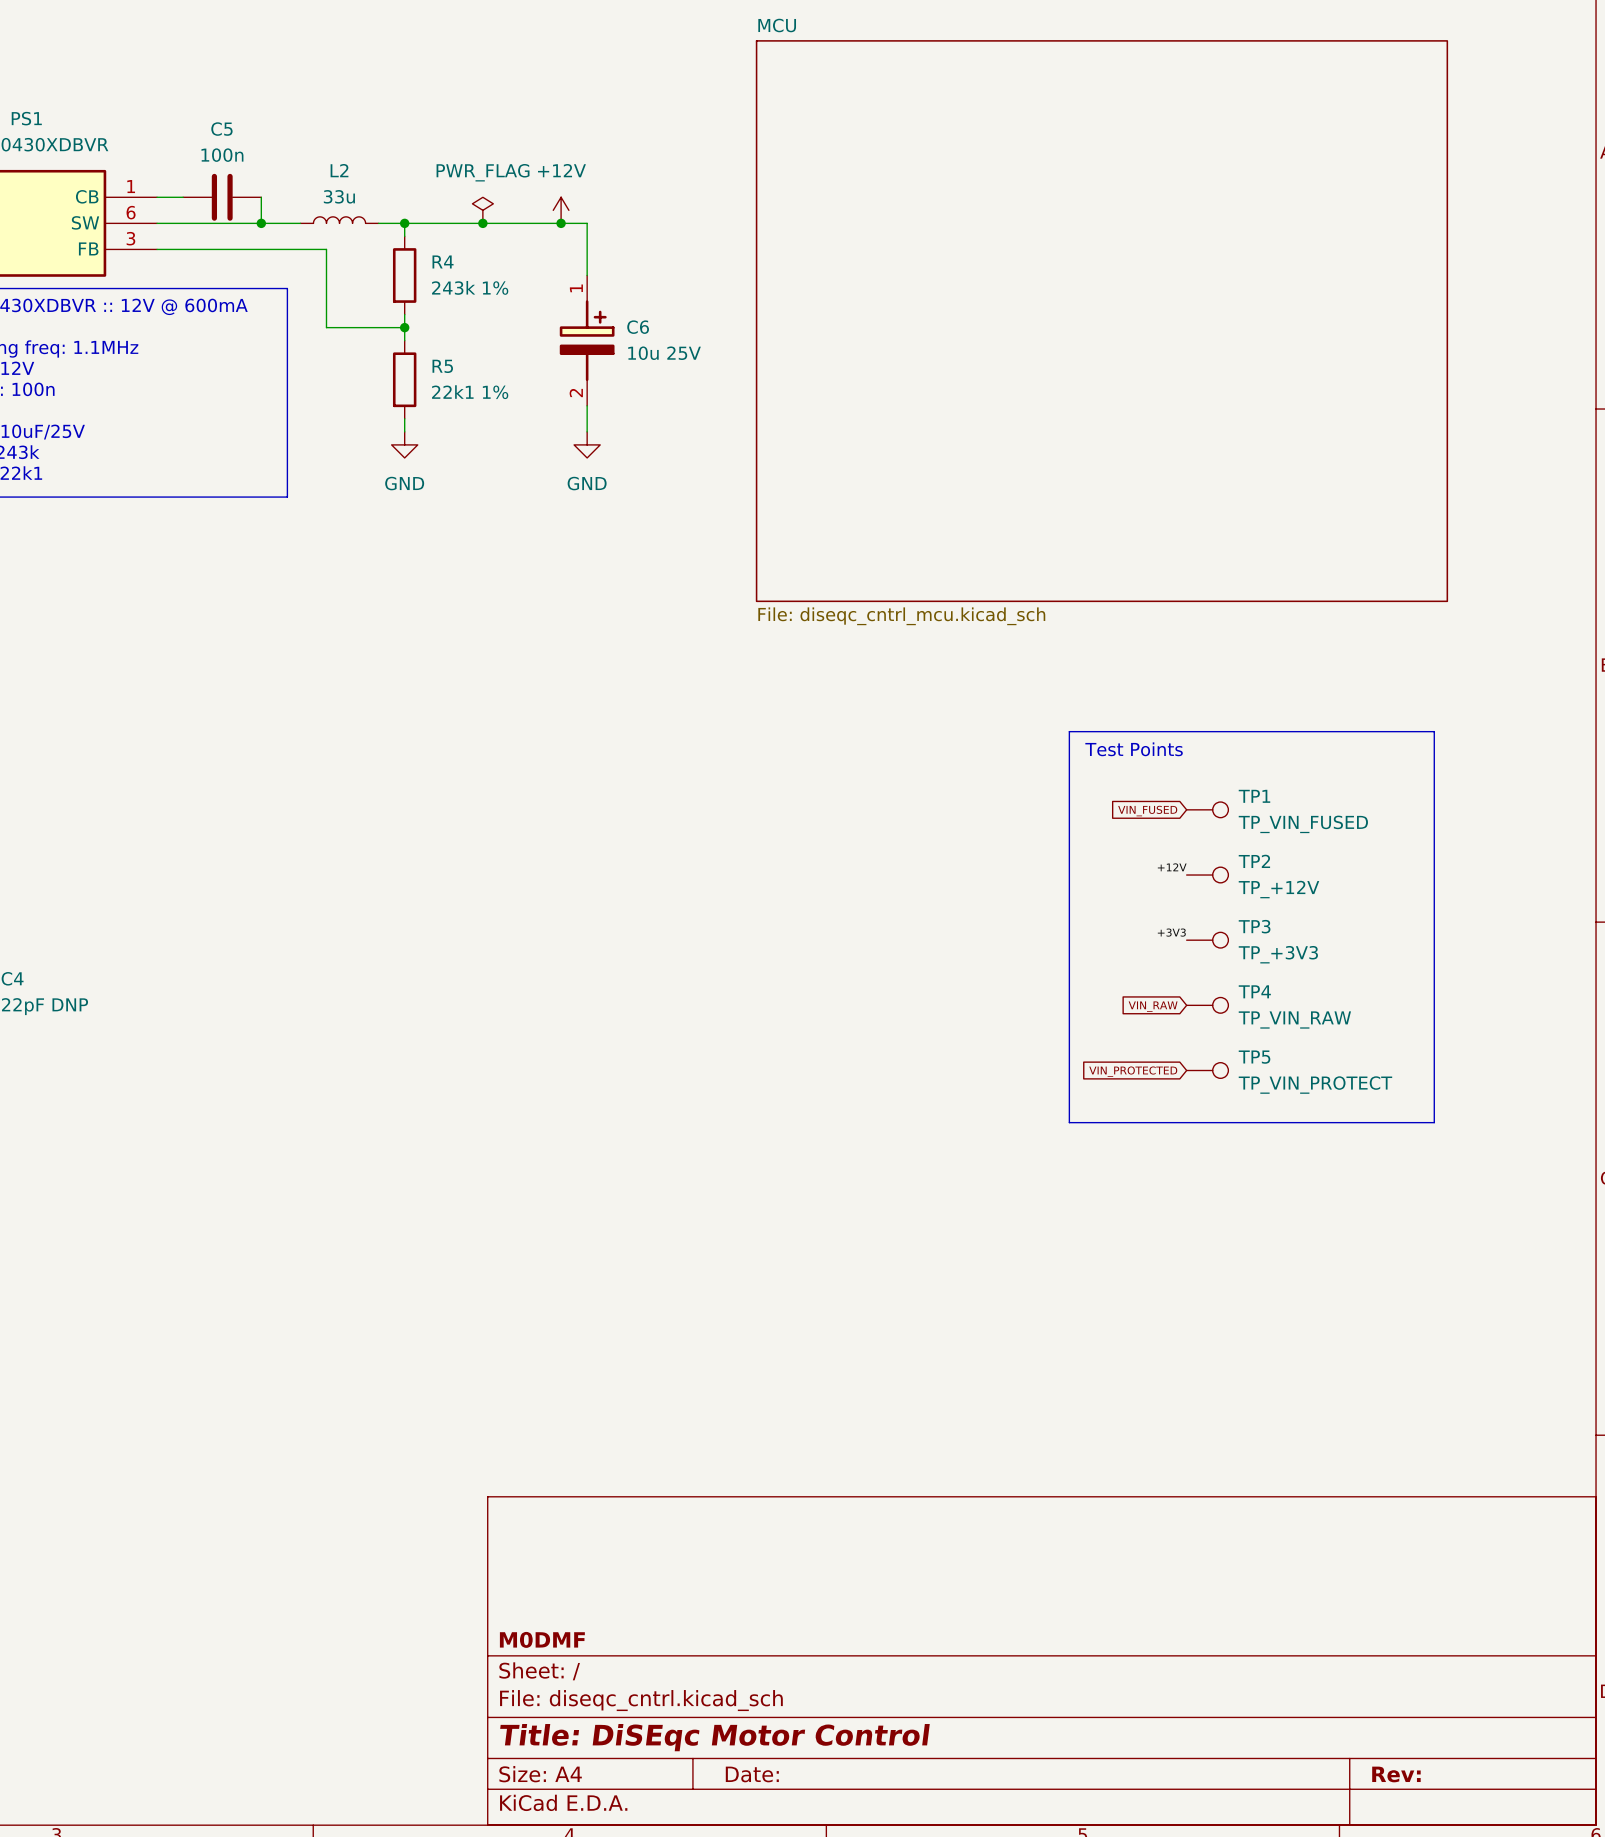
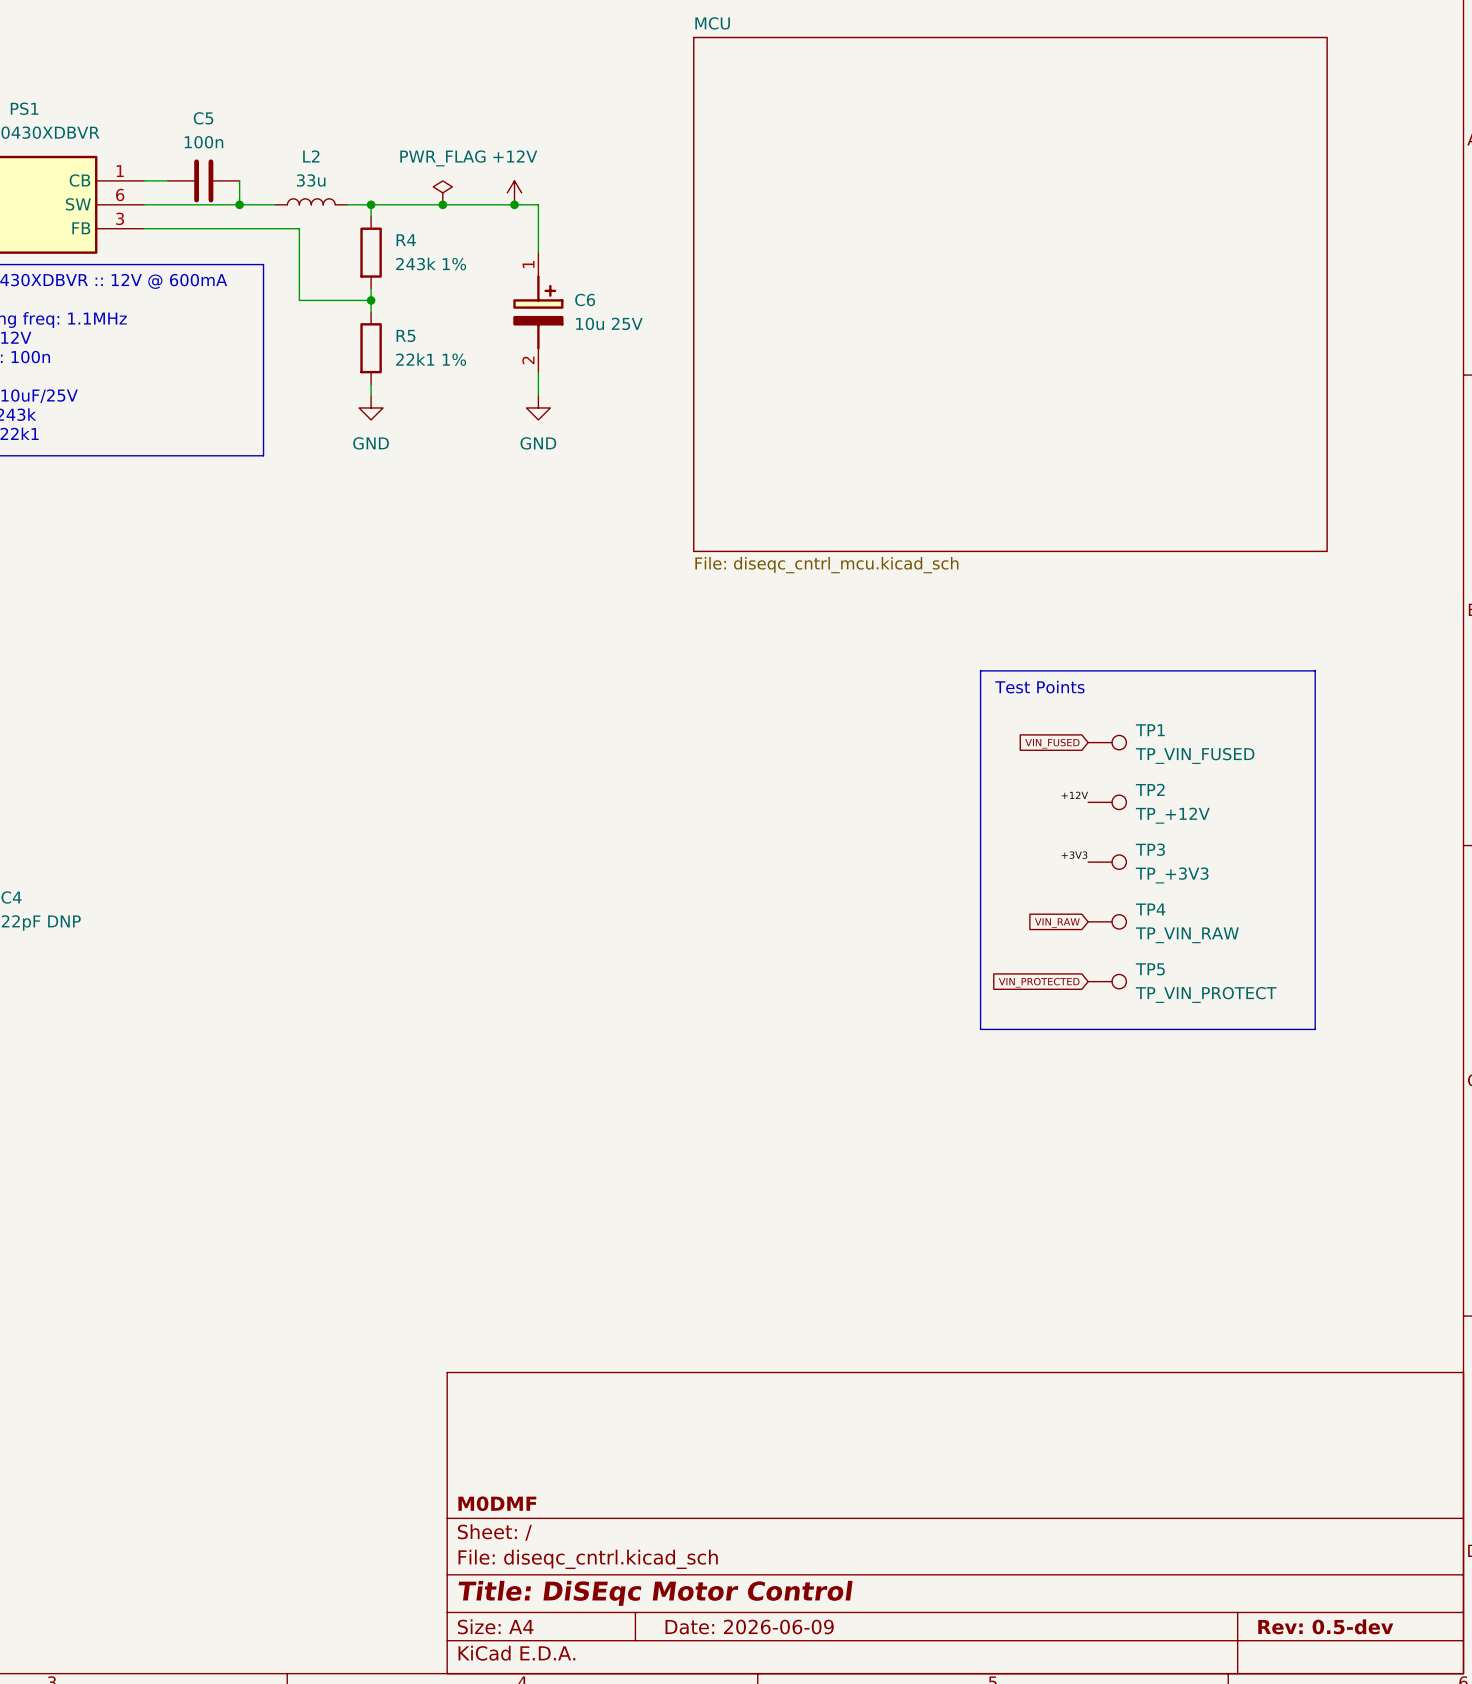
title block: Date: (752, 1774) -> Date: 2026-06-09 (749, 1627)
title block: Rev: (1396, 1774) -> Rev: 0.5-dev (1325, 1626)

